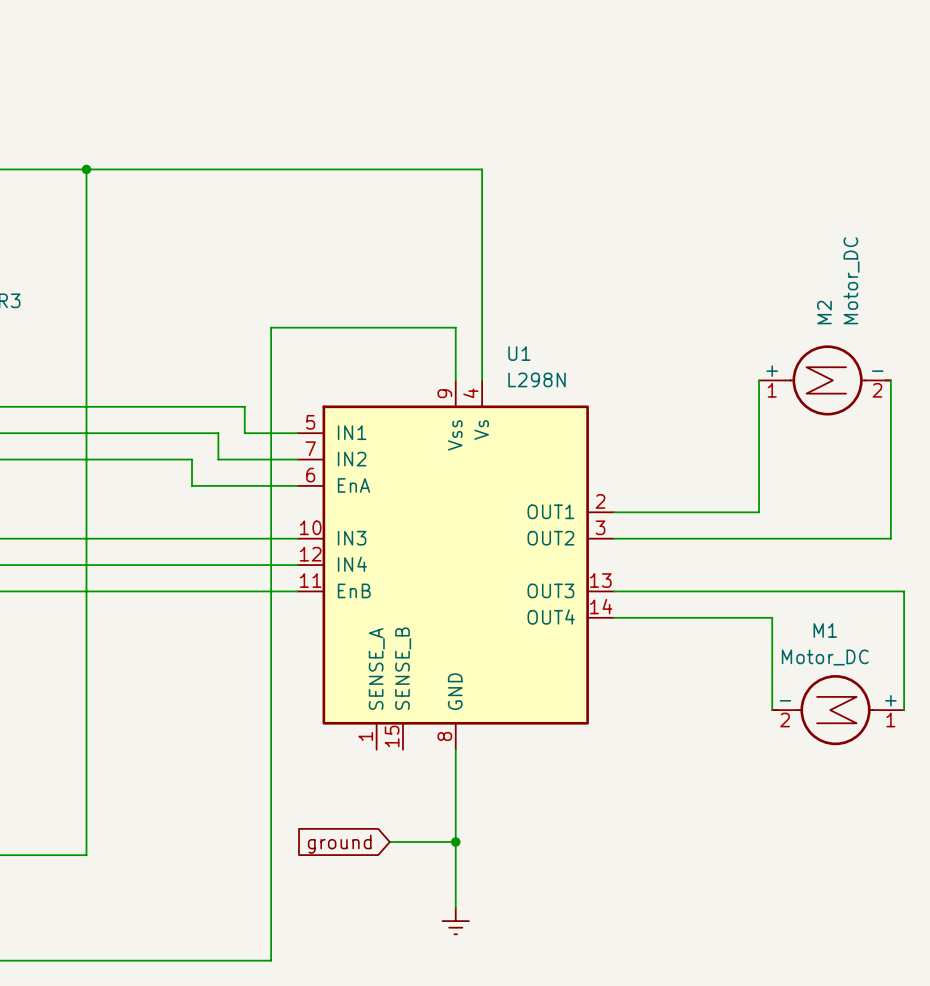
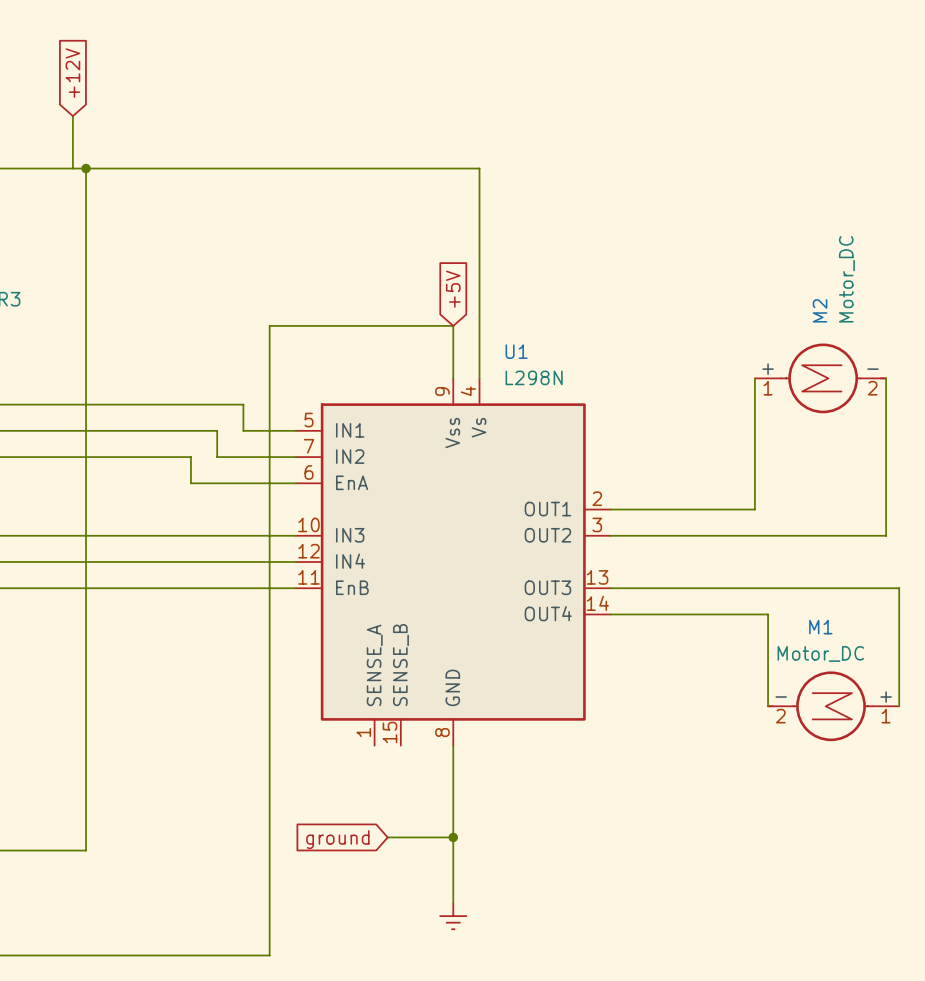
global label: none -> +12V (72, 73)
wire: none -> (72, 116) (72, 168)
global label: none -> +5V (453, 289)

